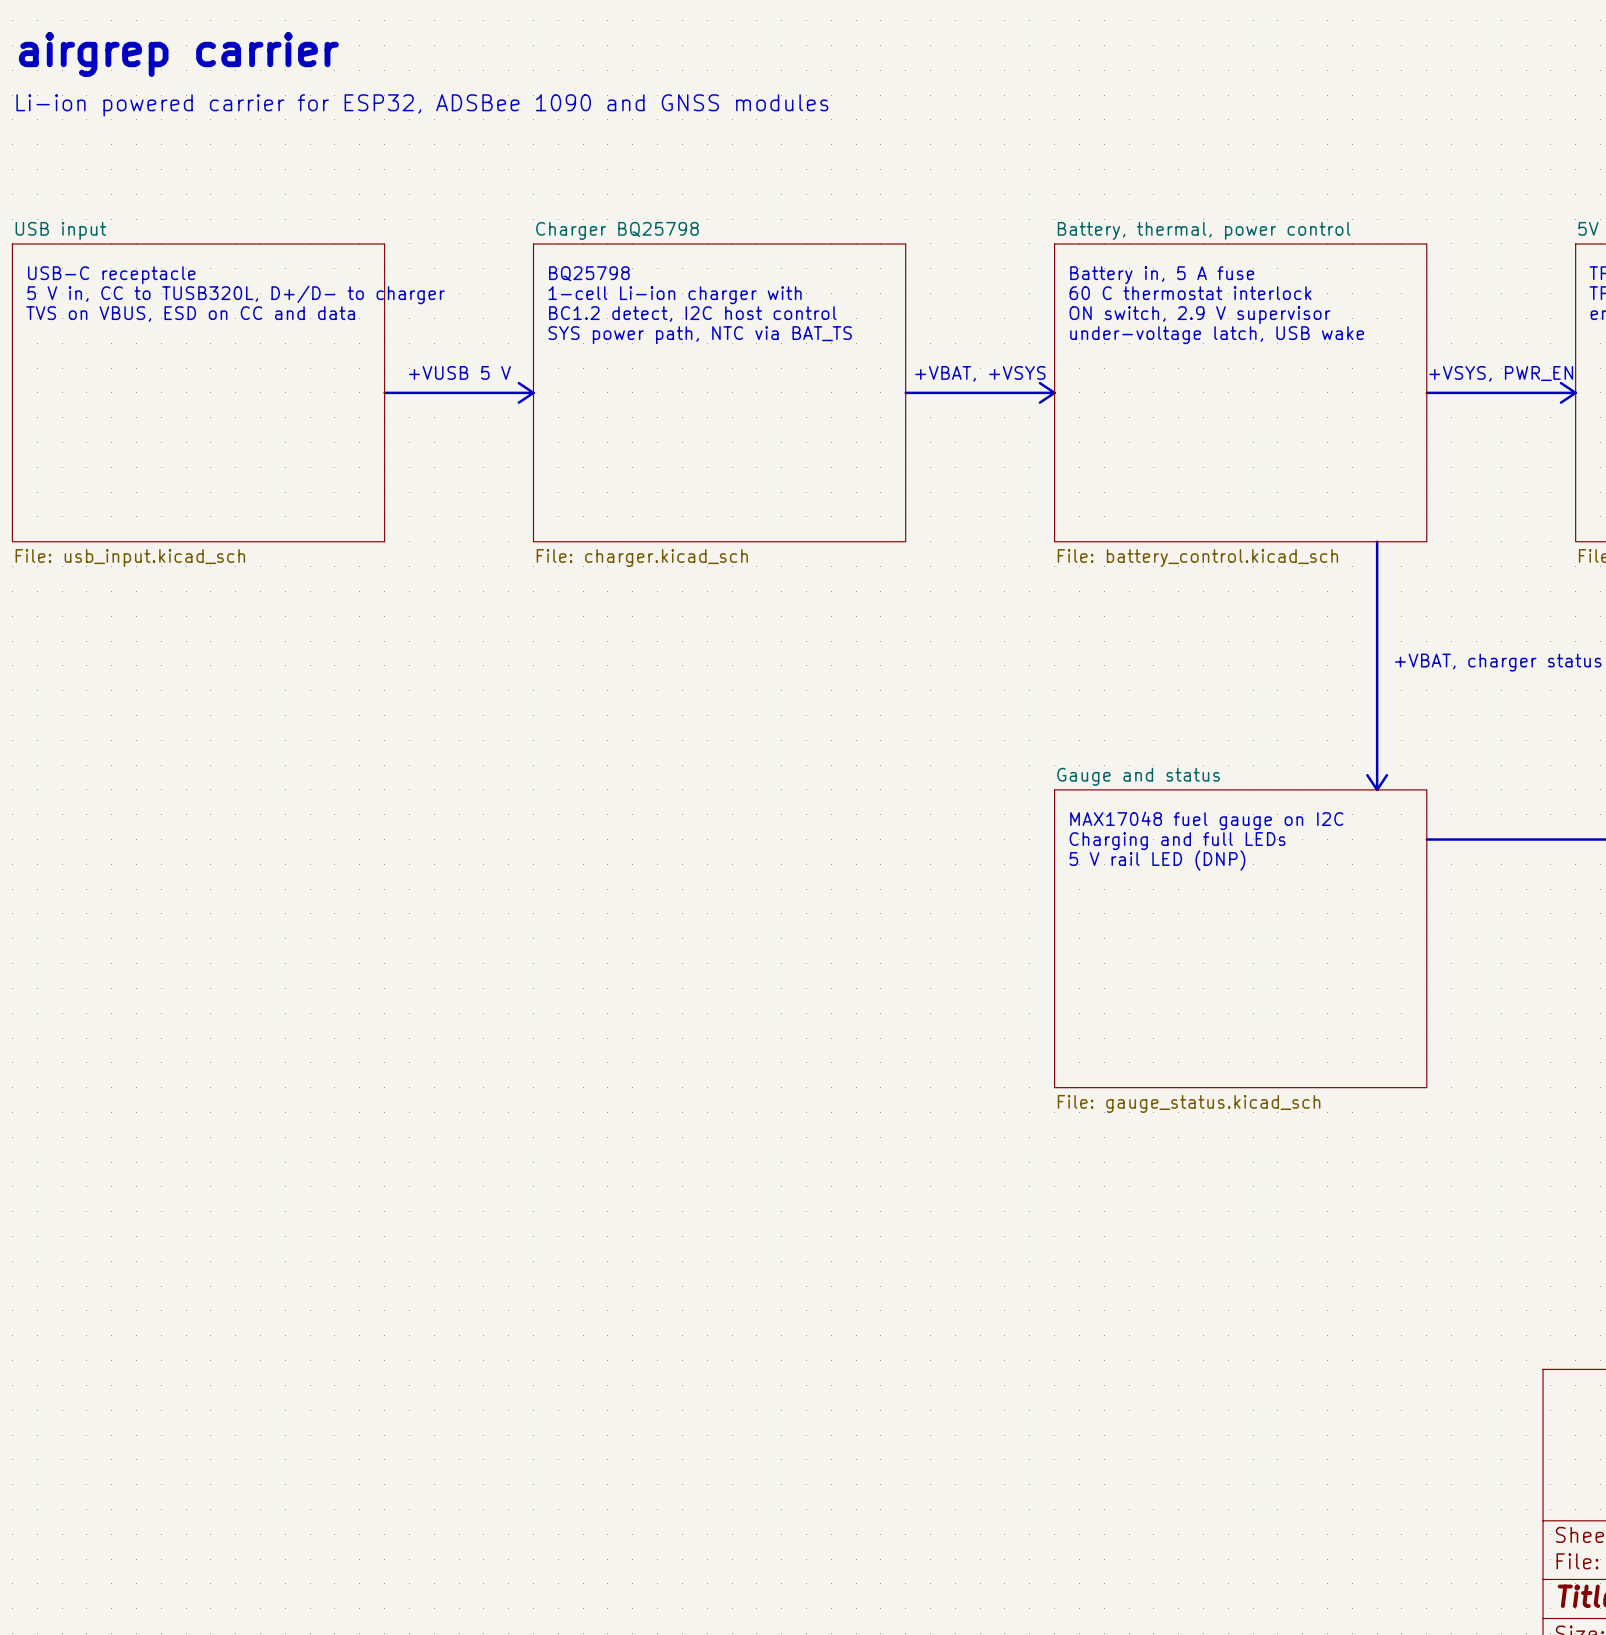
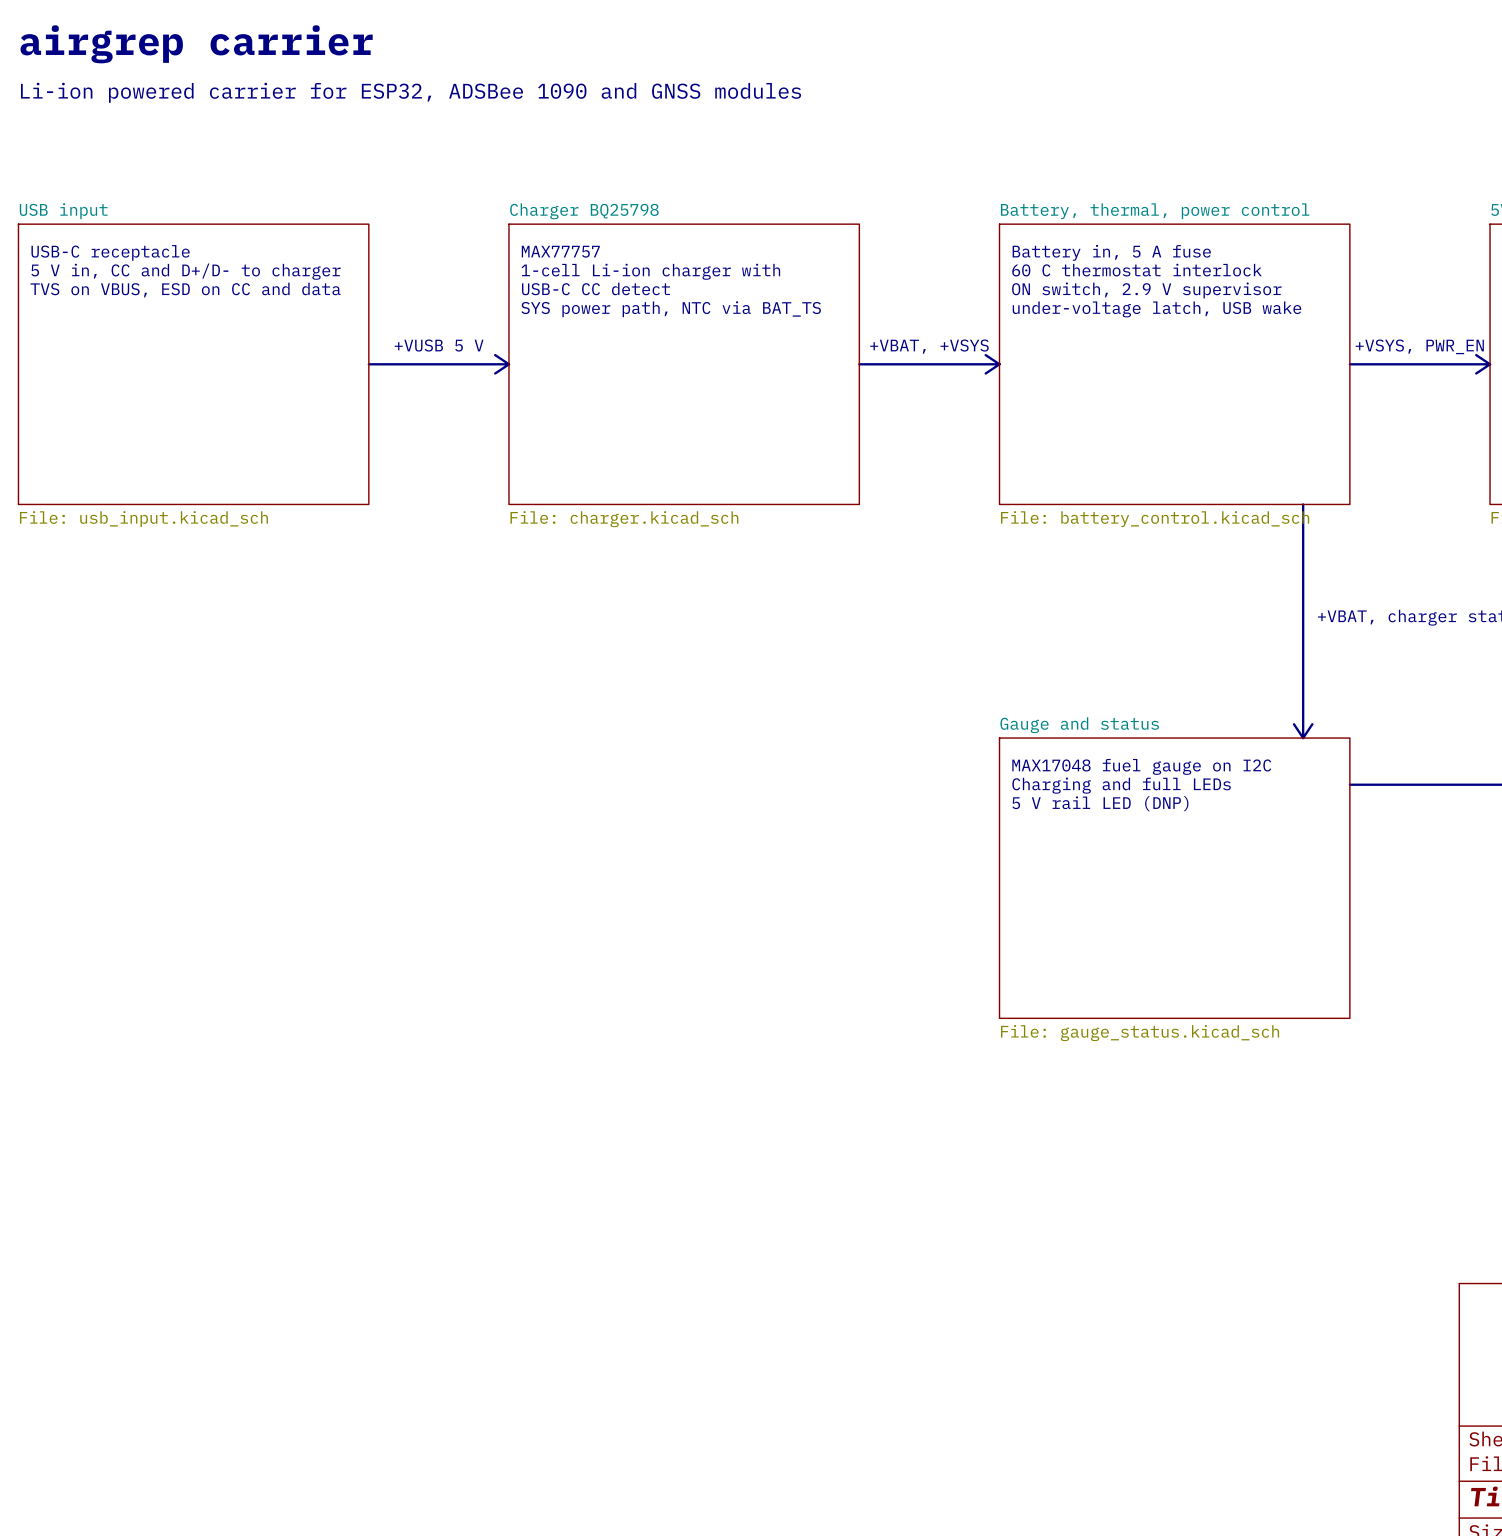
text: BQ25798 (589, 273) -> MAX77757 (560, 251)
text: 5 V in, CC to TUSB320L, D+/D- to charger (236, 294) -> 5 V in, CC and D+/D- to charger (186, 271)
text: BC1.2 detect, I2C host control (692, 313) -> USB-C CC detect (596, 288)

